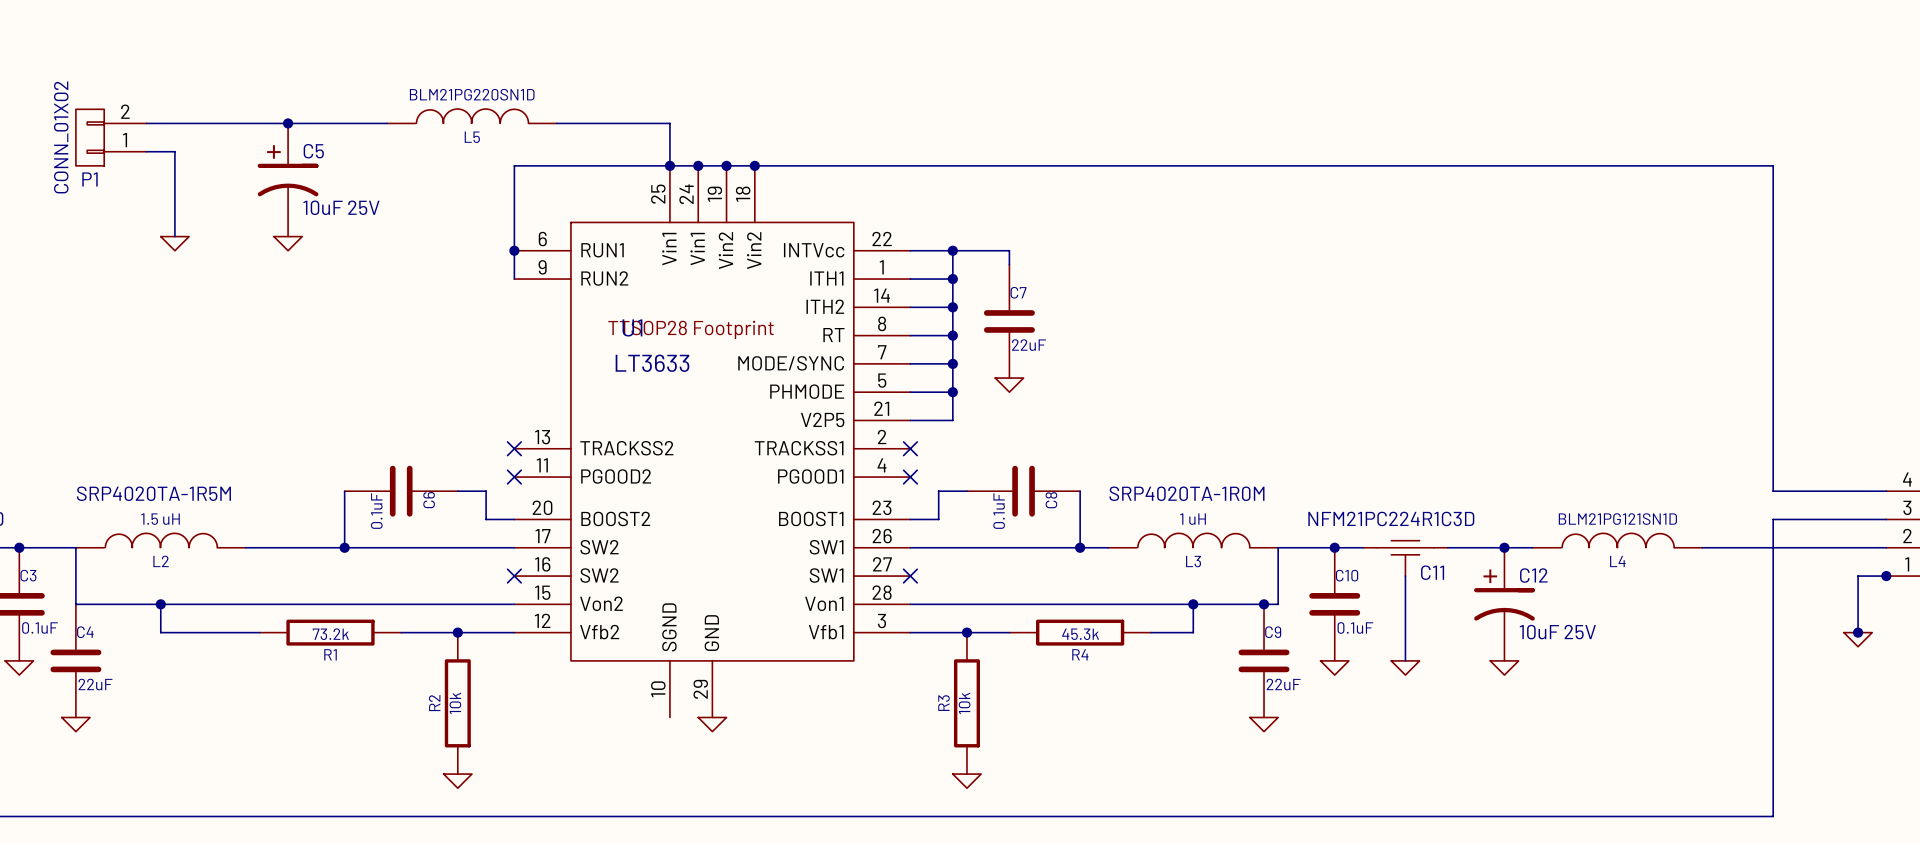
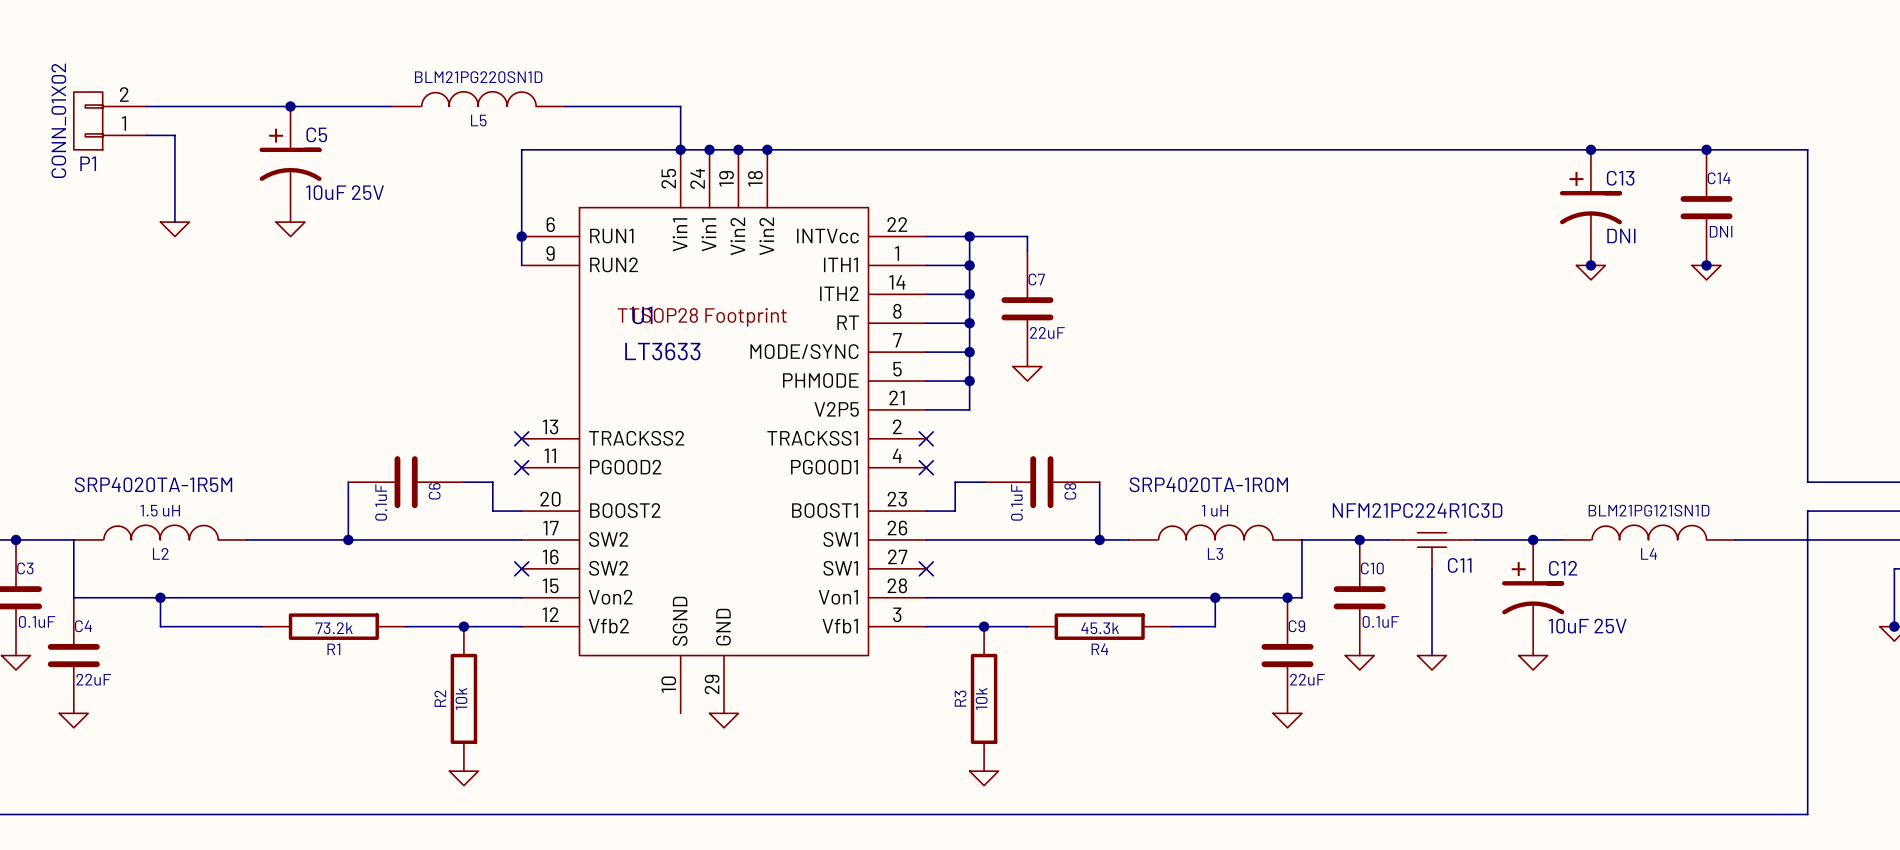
junction: none -> (1590, 149)
junction: none -> (1706, 149)
C13: none -> DNI (1590, 207)
C14: none -> DNI (1706, 207)
junction: none -> (1590, 265)
junction: none -> (1706, 265)
power symbol: none -> (1590, 272)
power symbol: none -> (1706, 272)

